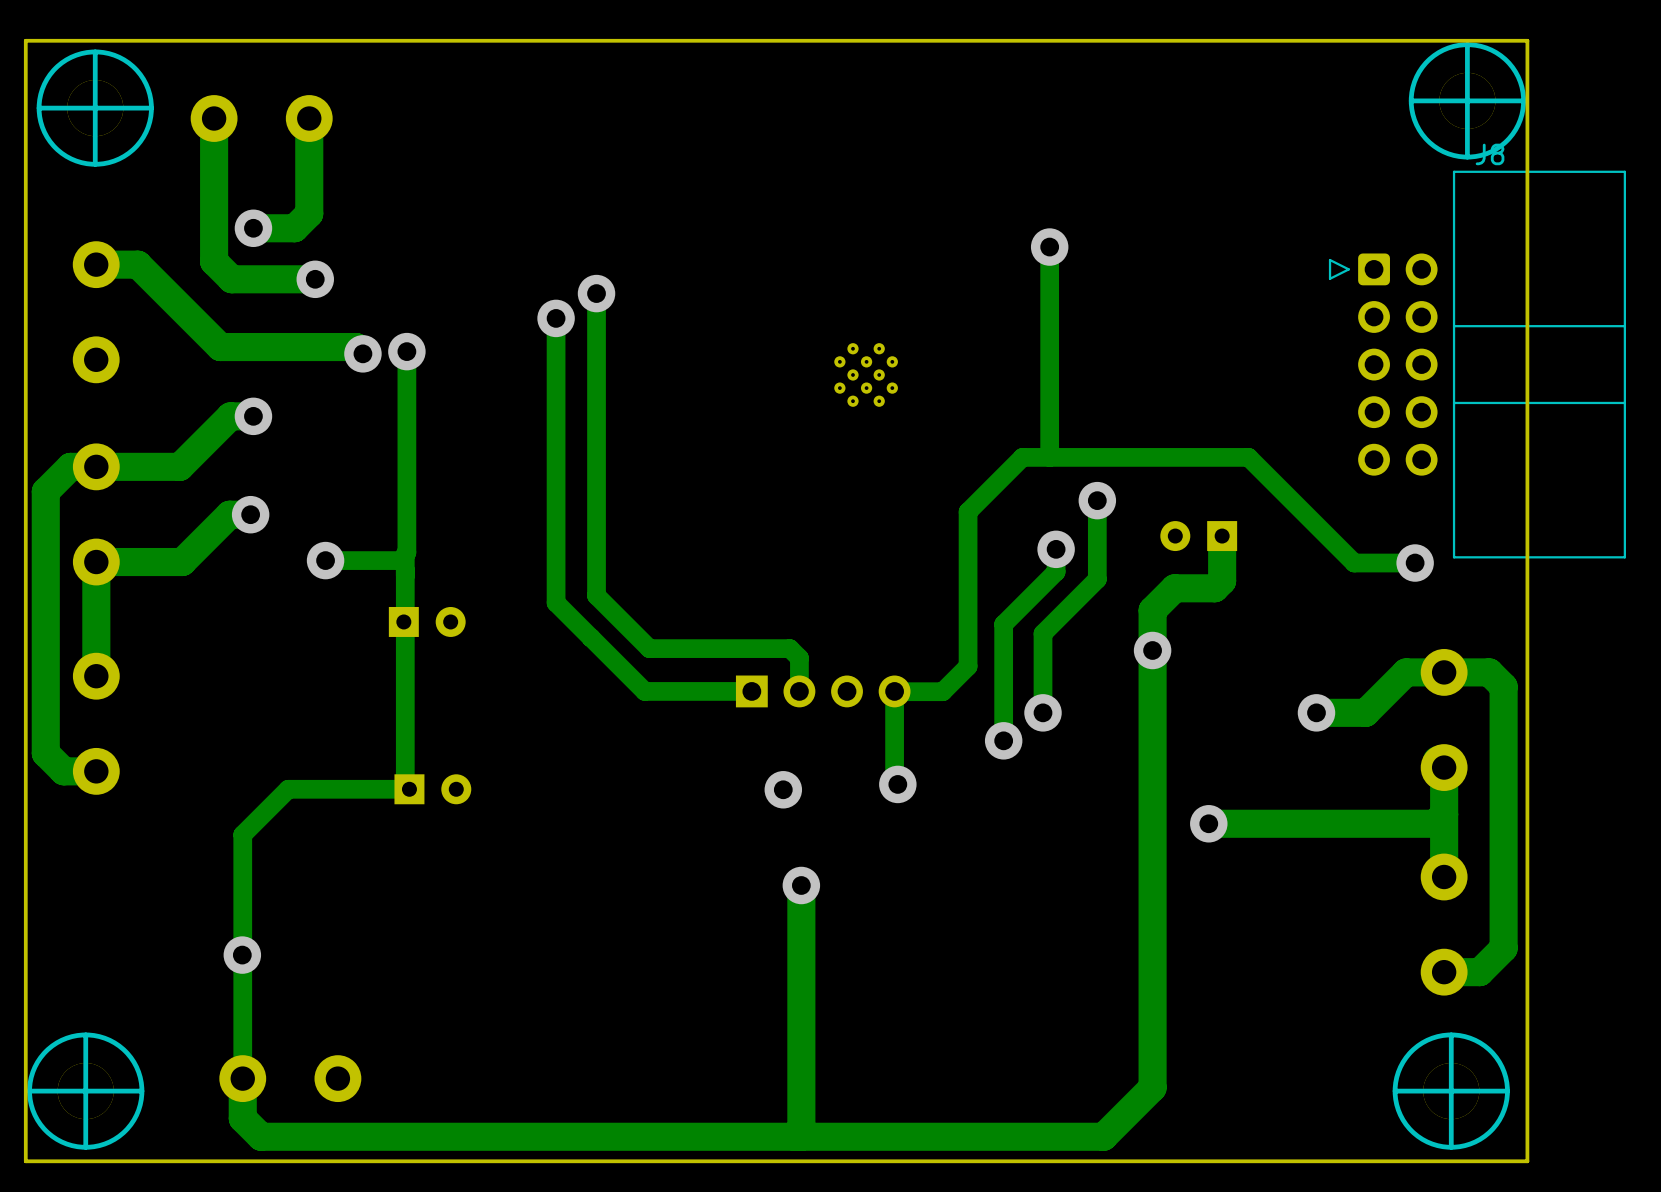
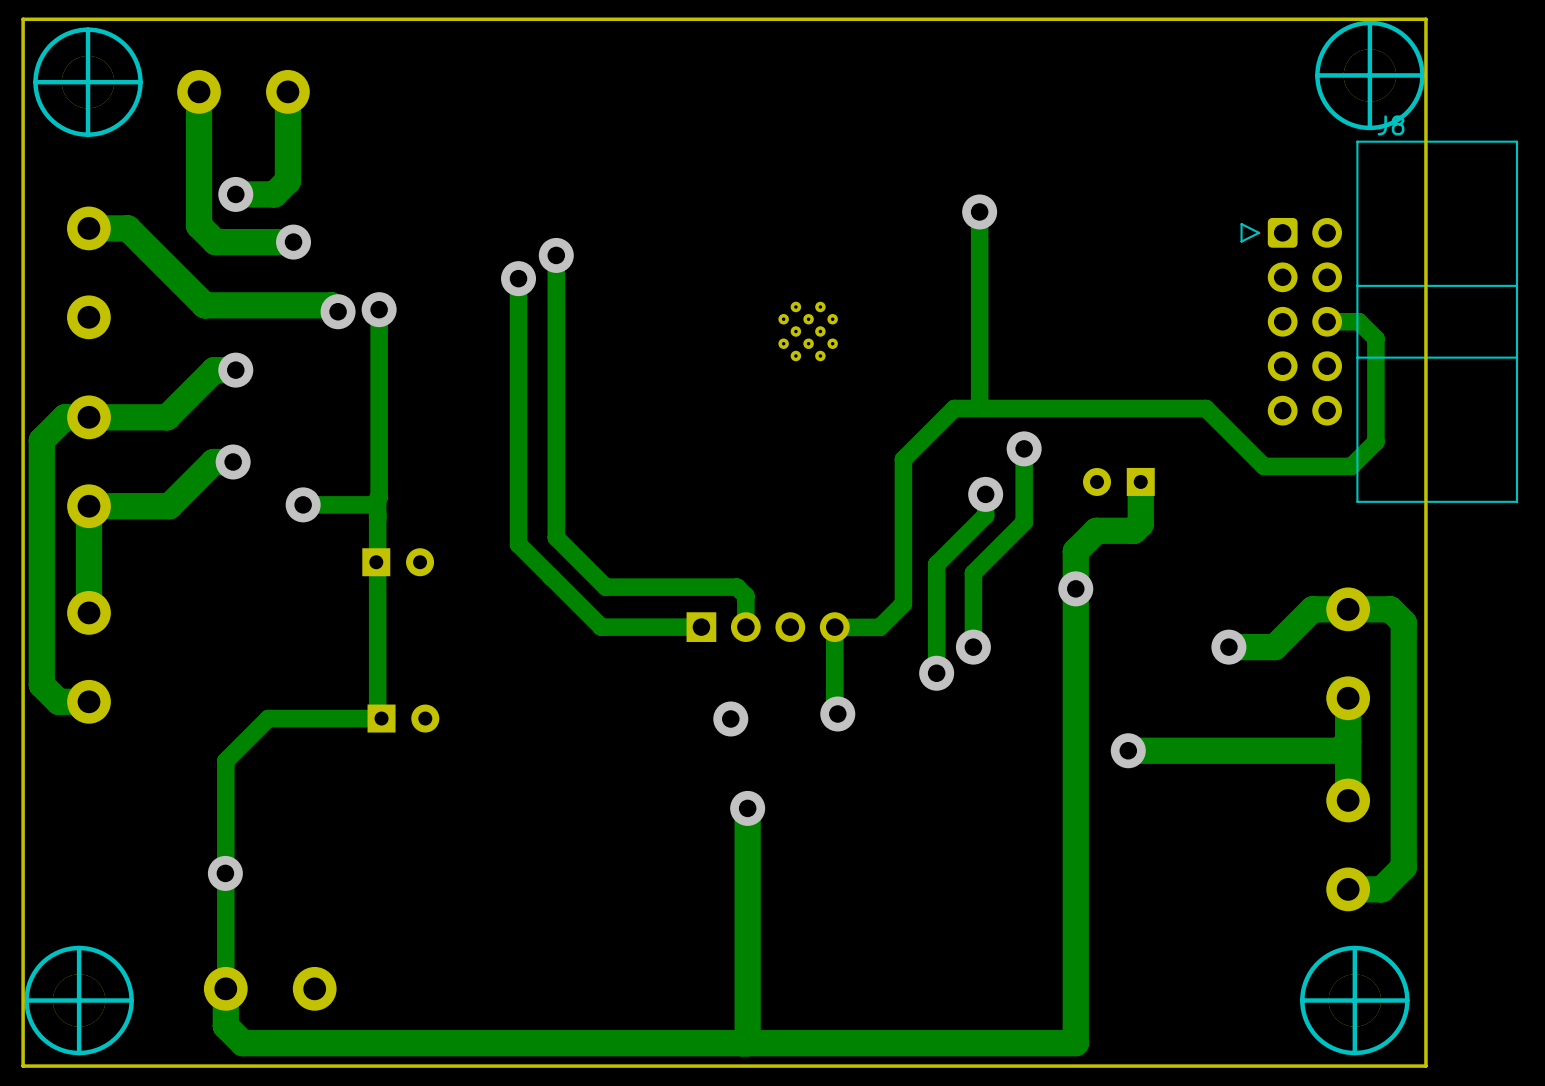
track: (1248, 457) (1354, 563) (1415, 563) -> (1165, 408) (1206, 408) (1263, 466) (1351, 466) (1375, 441) (1375, 338) (1359, 321) (1327, 321)
via: (1415, 563) -> none
track: (1152, 1087) (1103, 1136) -> (1075, 997) (1075, 1043) (1030, 1043)

